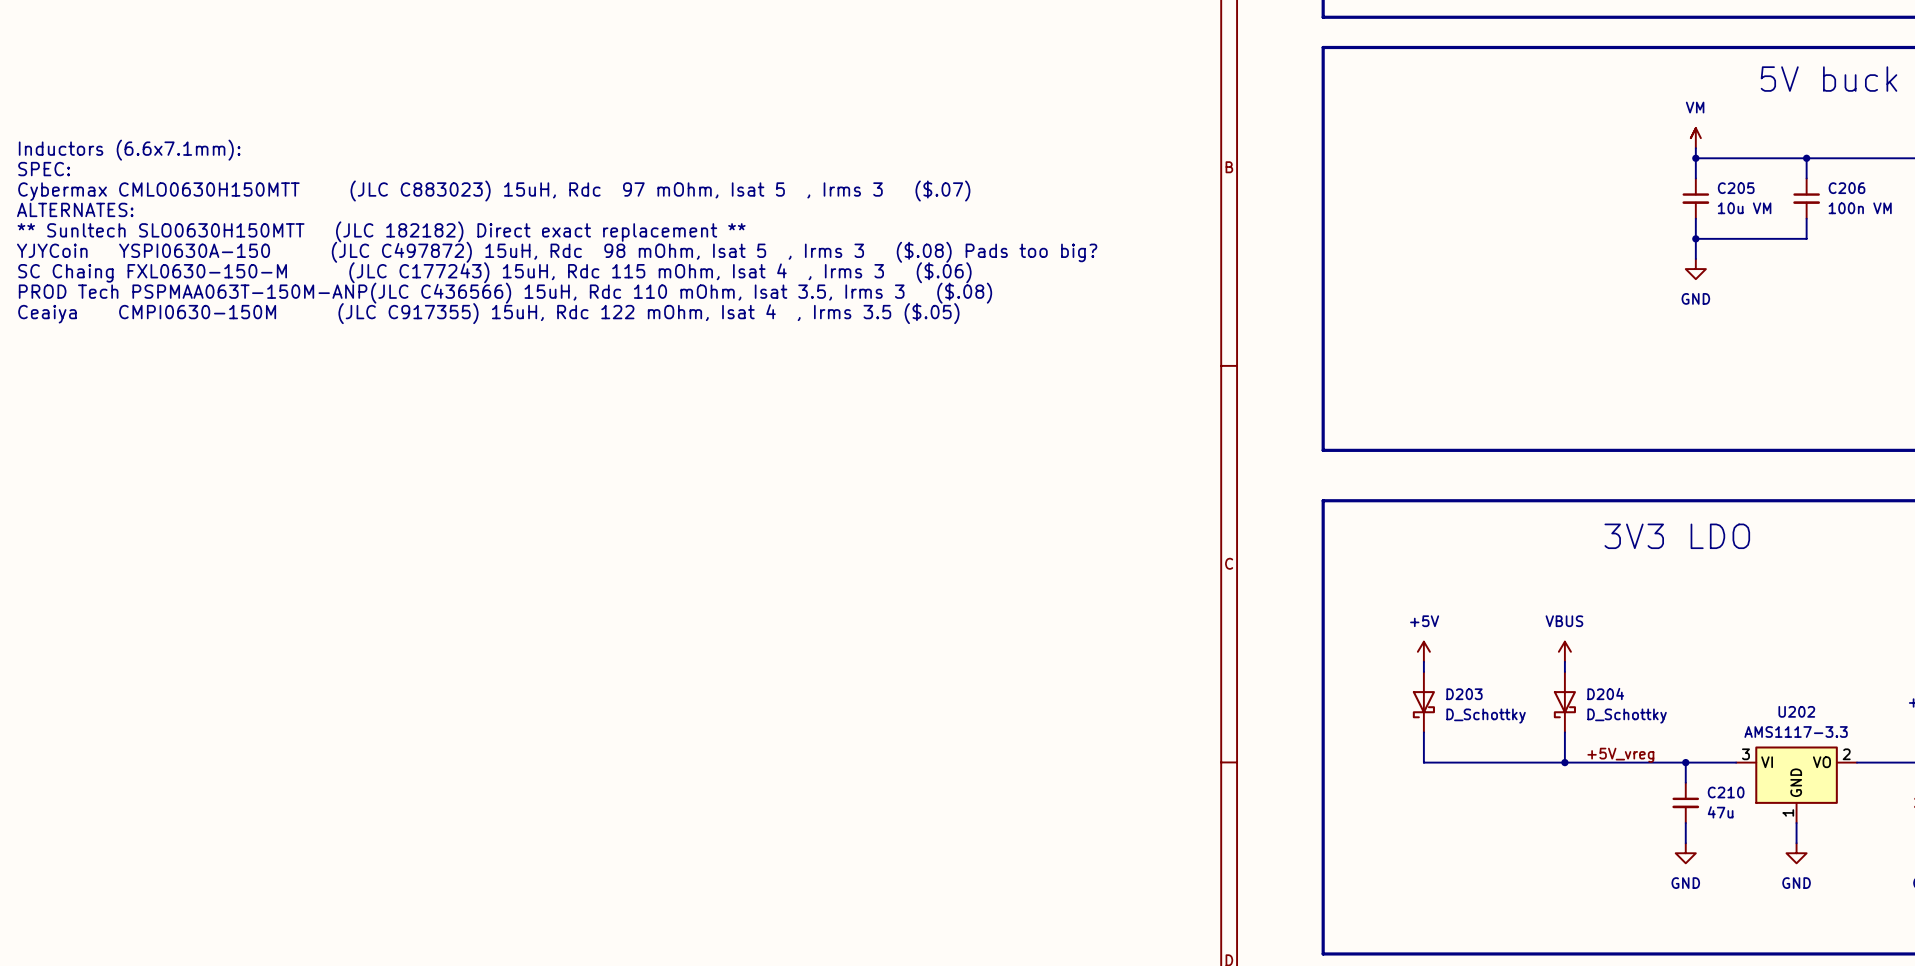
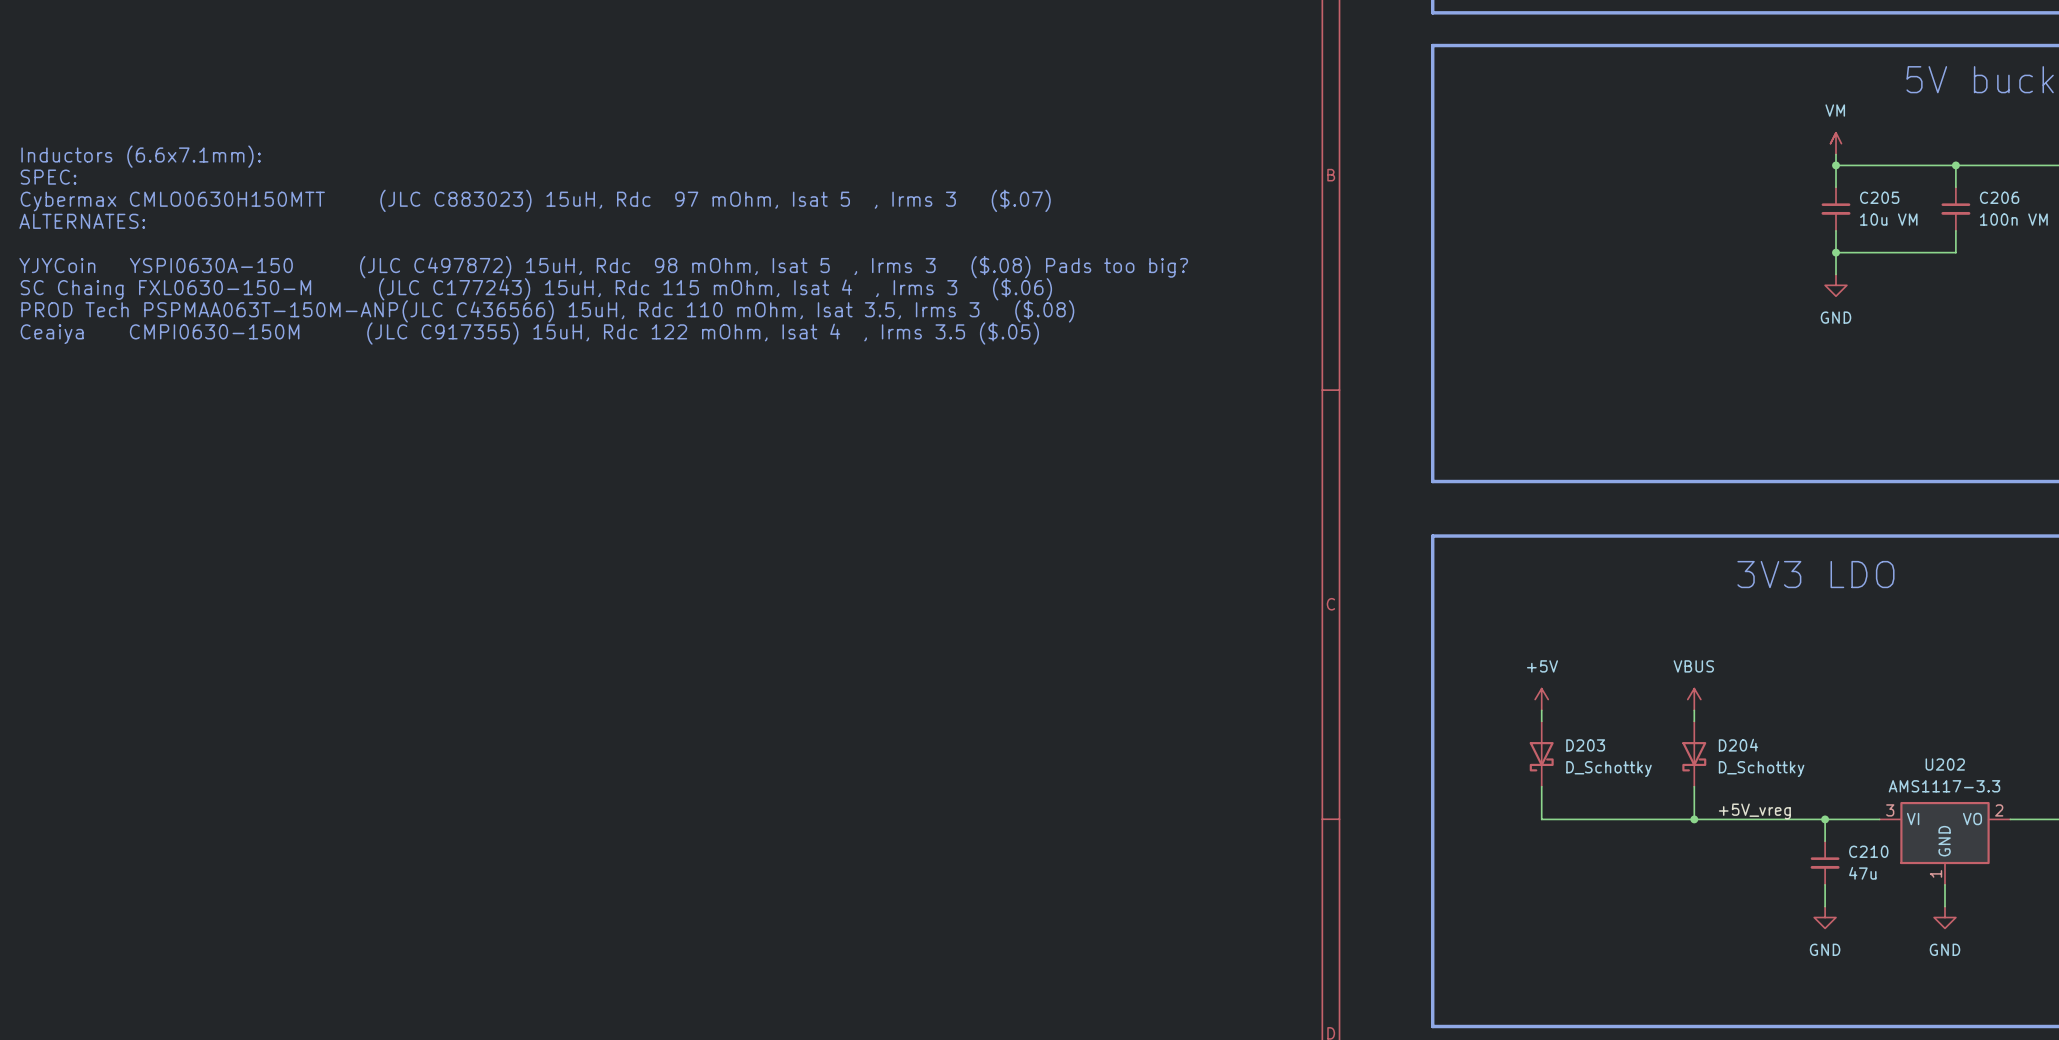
text: ** Sunltech SLO0630H150MTT (JLC 182182) Direct exact replacement ** (381, 231) -> none

